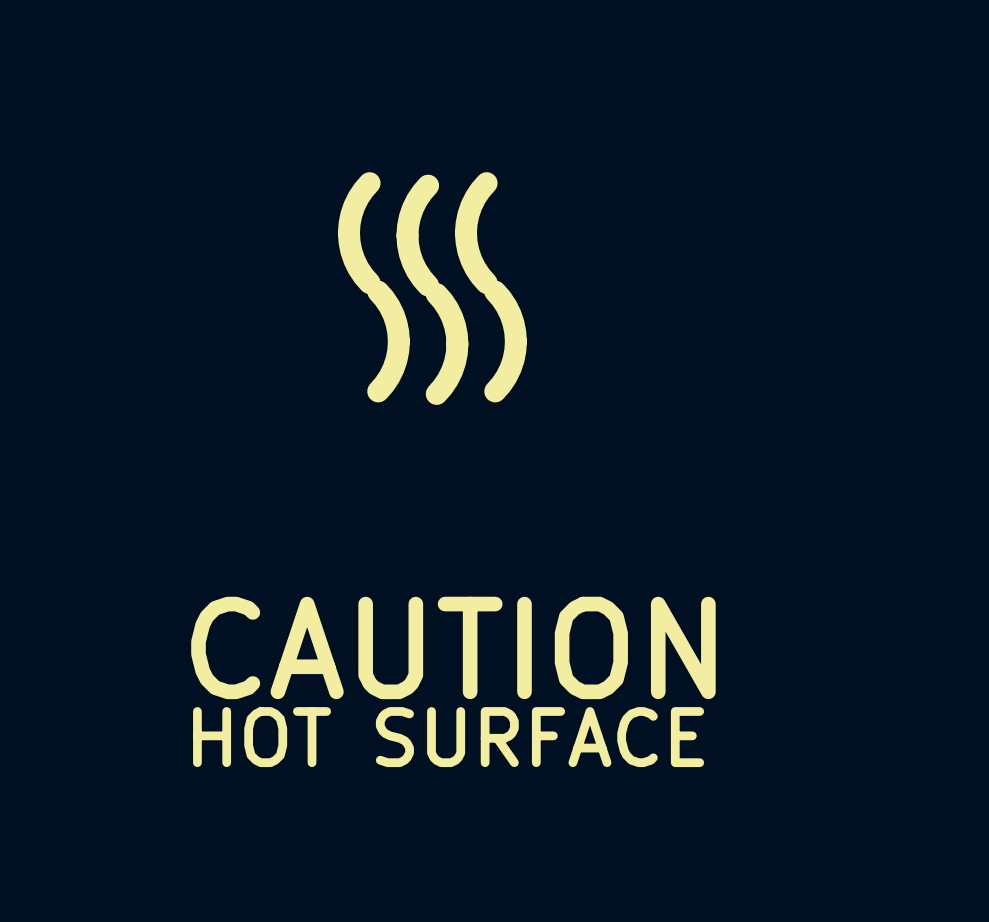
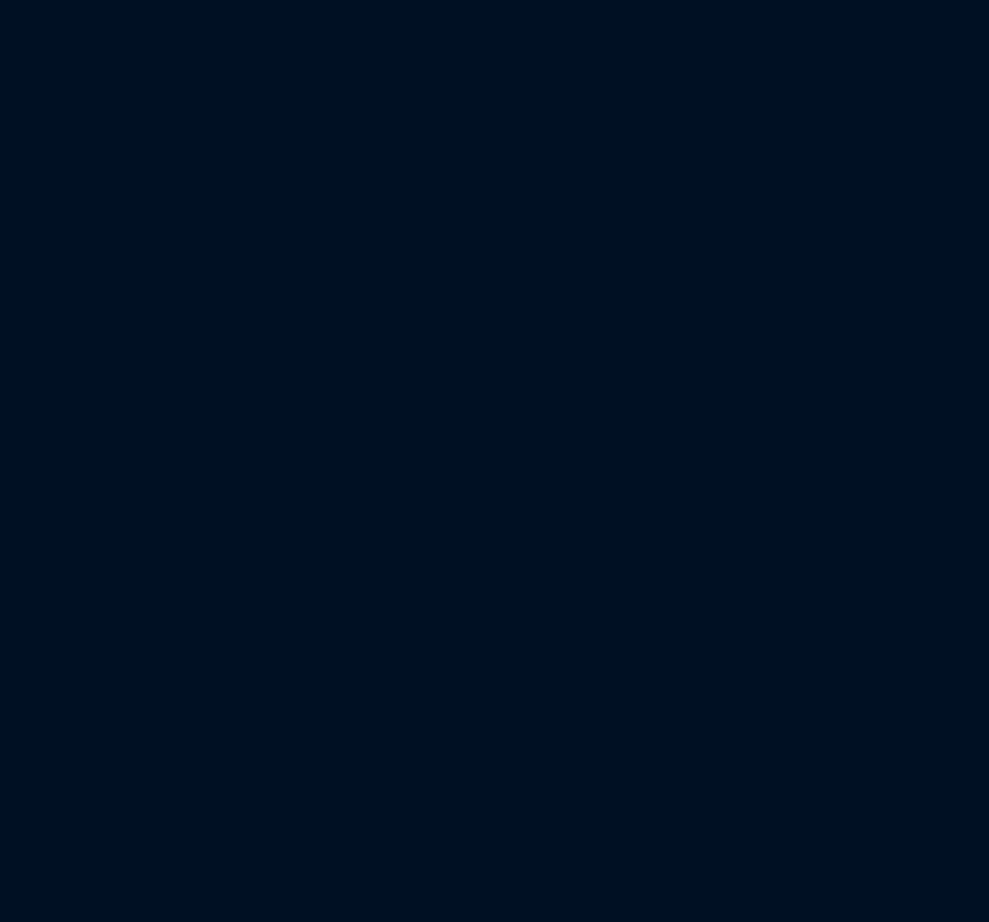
line: (369, 183) (354, 206) (348, 233) (354, 260) (369, 283) -> none
line: (486, 183) (471, 206) (465, 233) (471, 260) (486, 283) -> none
line: (428, 185) (412, 208) (407, 235) (412, 262) (428, 285) -> none
line: (378, 291) (393, 314) (398, 341) (393, 368) (378, 391) -> none
line: (495, 291) (510, 314) (515, 341) (510, 368) (495, 391) -> none
line: (436, 294) (452, 316) (457, 344) (452, 371) (436, 393) -> none
text: CAUTION (453, 647) -> none
text: HOT SURFACE (448, 737) -> none

